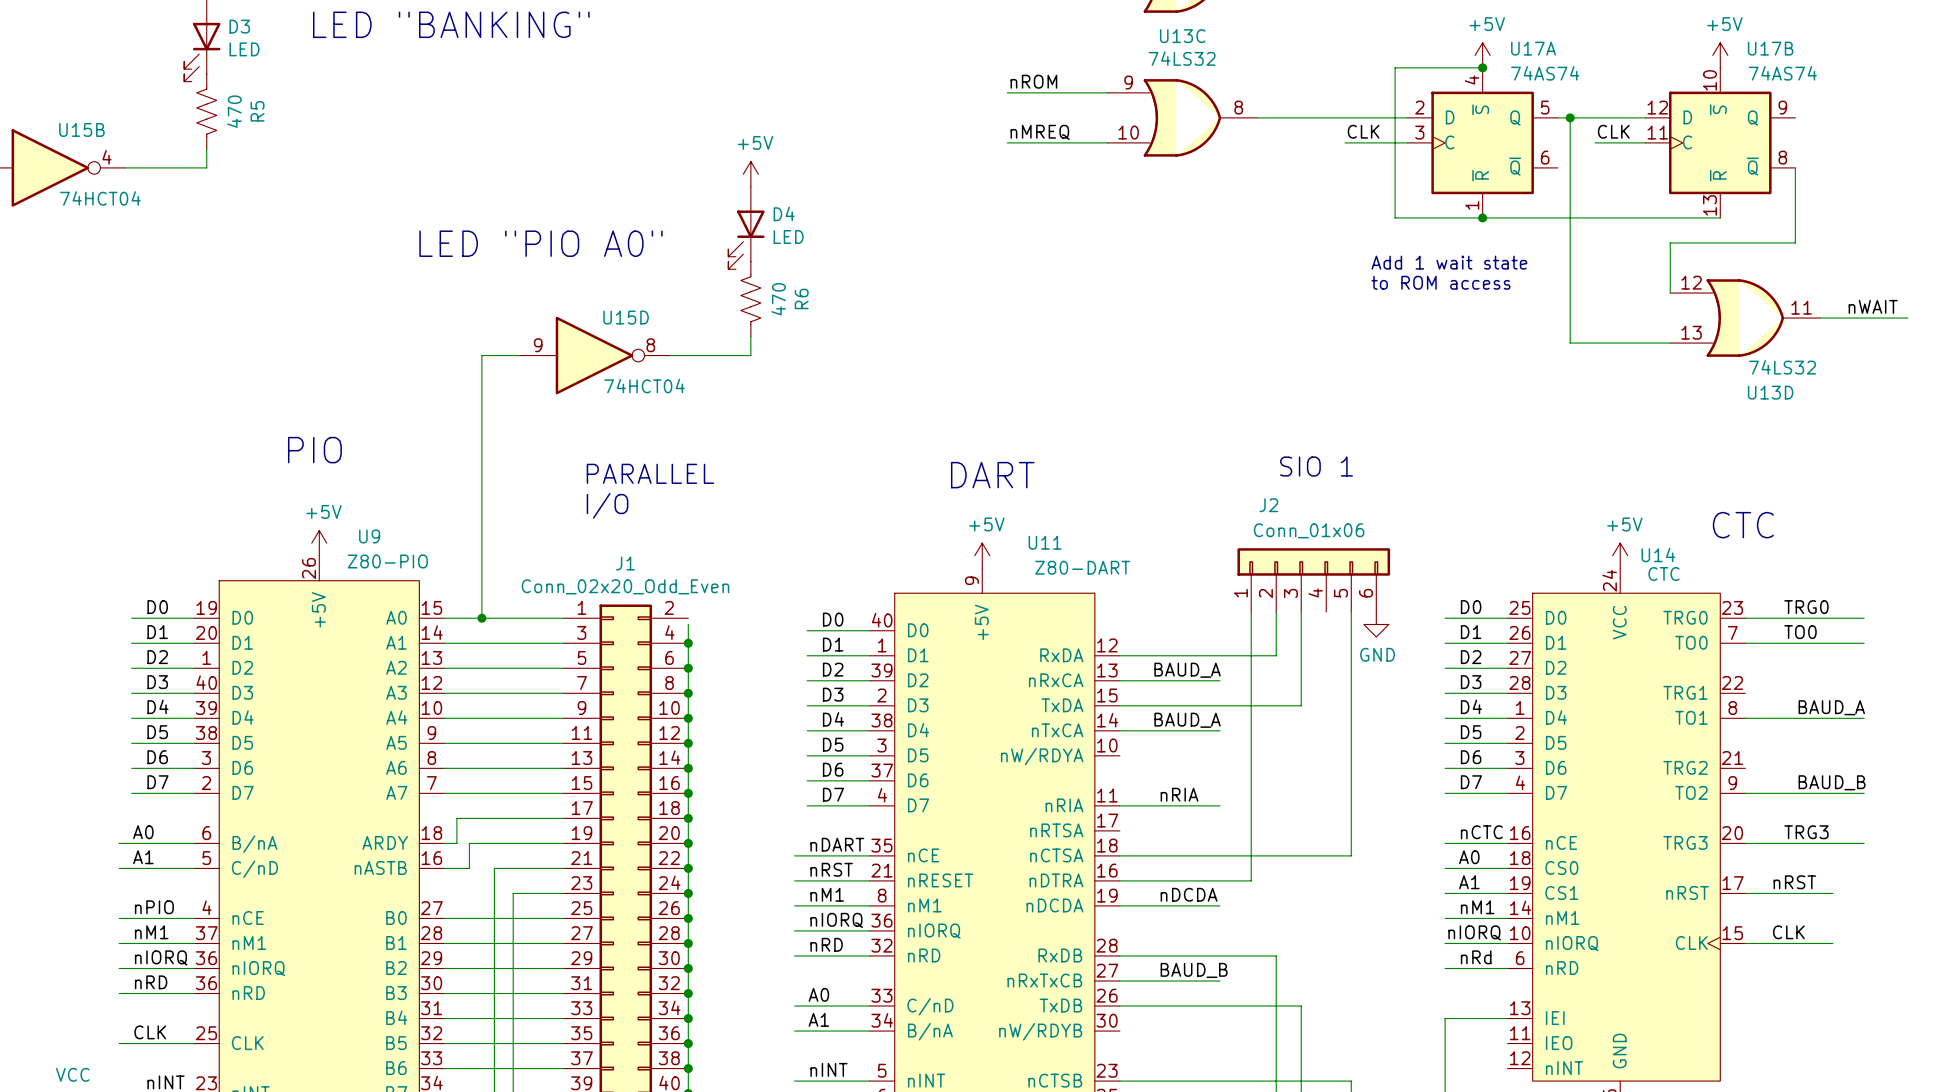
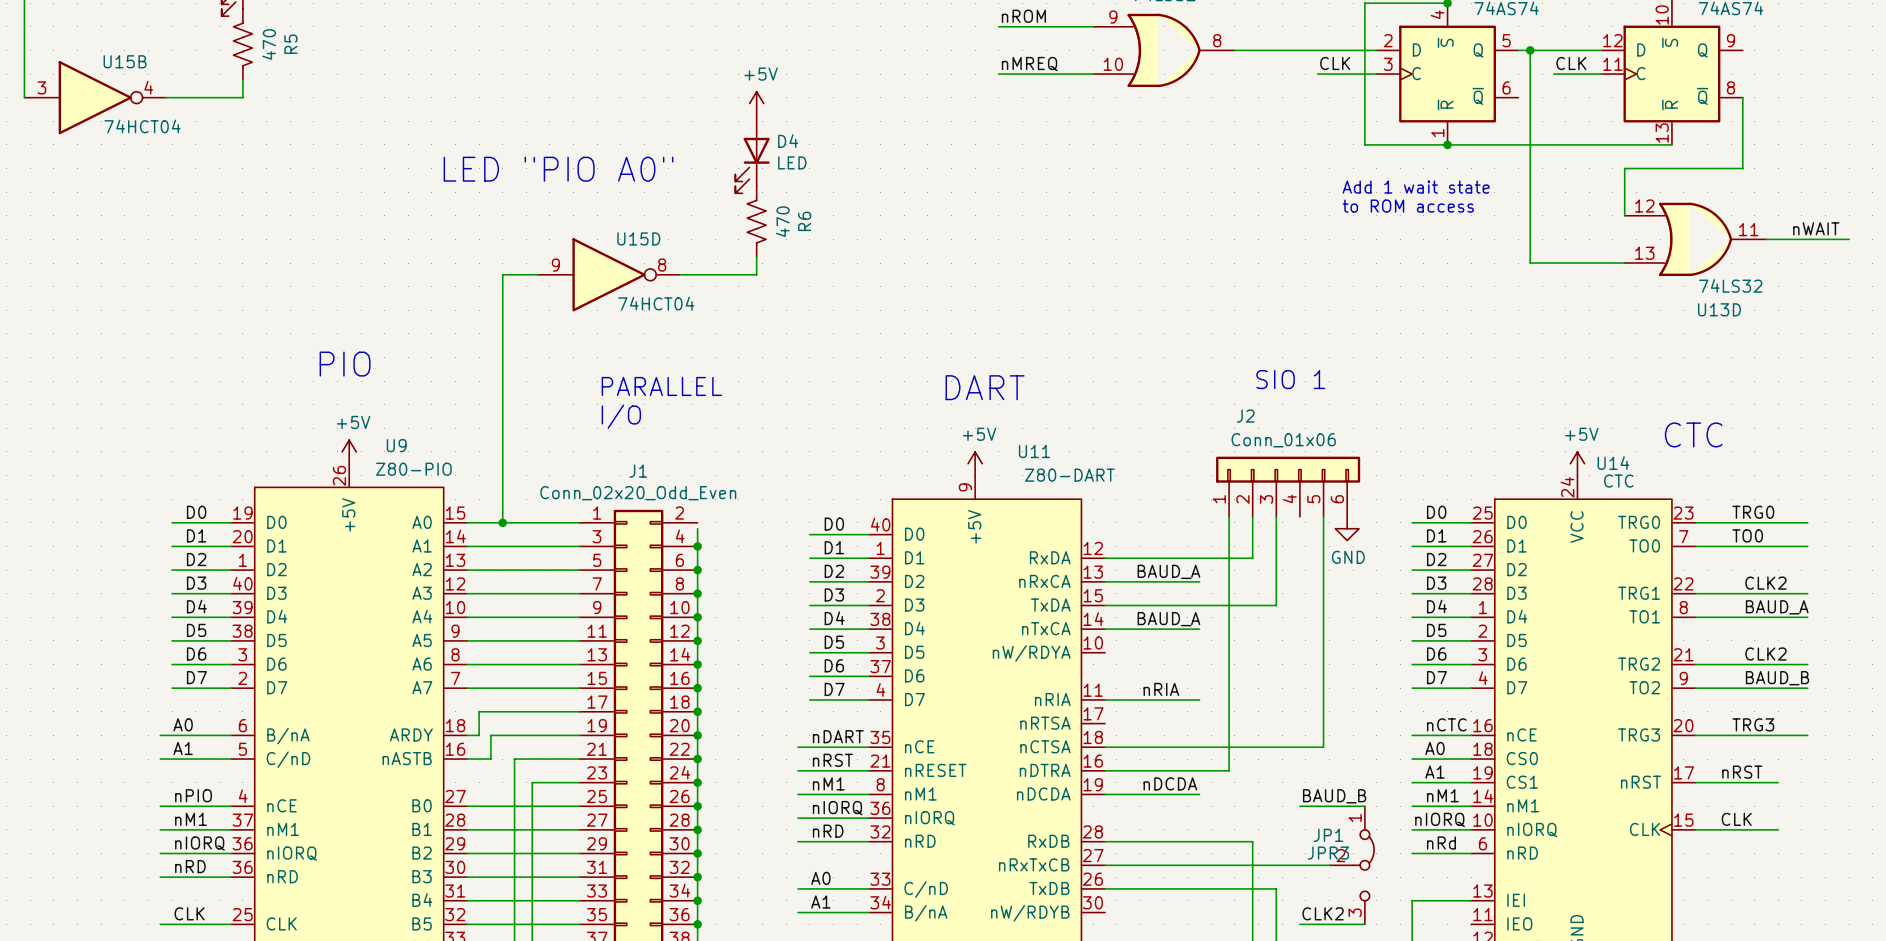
label: none -> CLK2 (1765, 583)
wire: none -> (1695, 593) (1807, 593)
label: none -> CLK2 (1765, 654)
wire: none -> (1695, 664) (1807, 664)
wire: none -> (1299, 806) (1364, 806)
label position: BAUD_B (1194, 970) -> BAUD_B (1334, 796)
wire: none -> (1199, 865) (1329, 865)
JP1: none -> JPR3 (1351, 865)
label: none -> CLK2 (1323, 913)
wire: none -> (1299, 924) (1364, 924)

